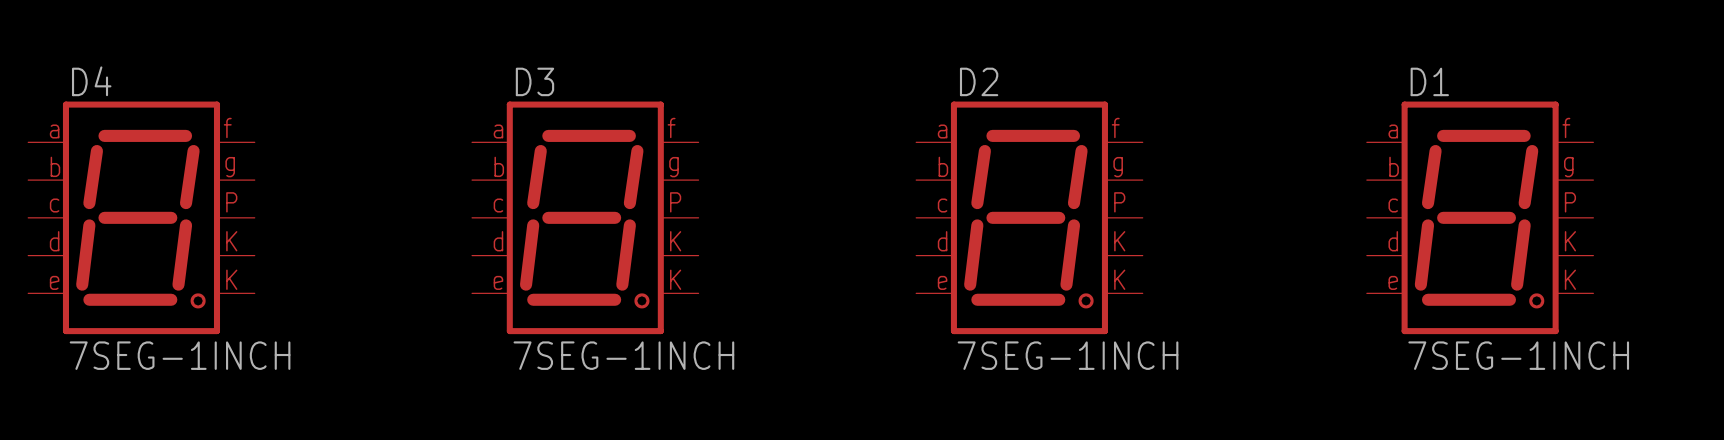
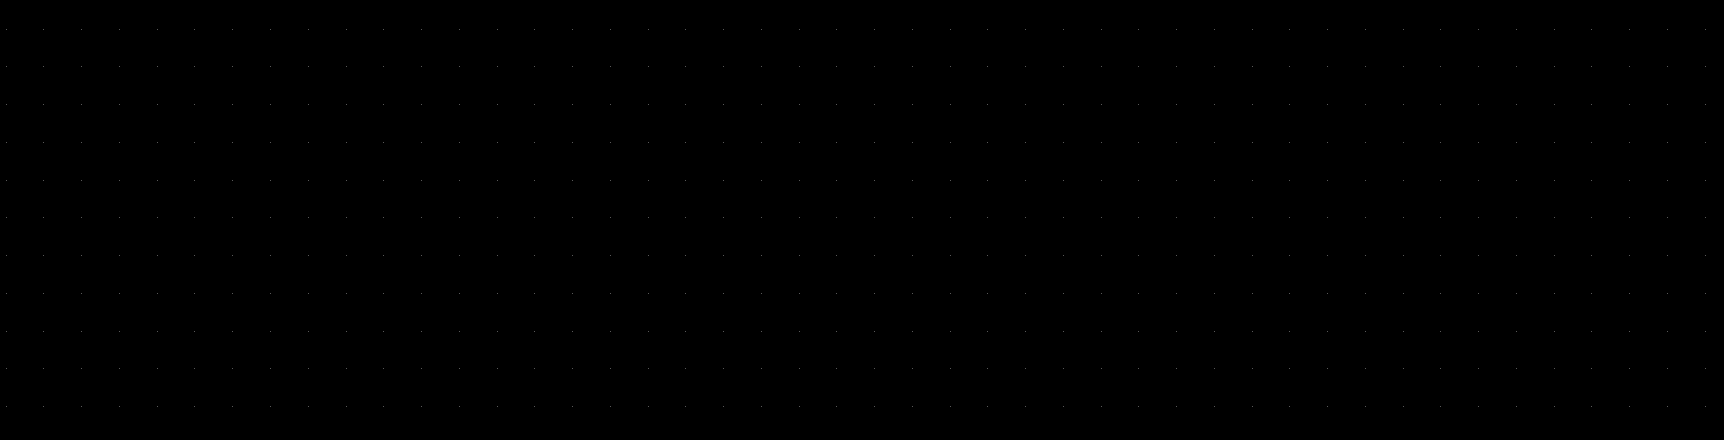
D4: 7SEG-1INCH (141, 217) -> none
D3: 7SEG-1INCH (585, 217) -> none
D2: 7SEG-1INCH (1029, 217) -> none
D1: 7SEG-1INCH (1480, 217) -> none

